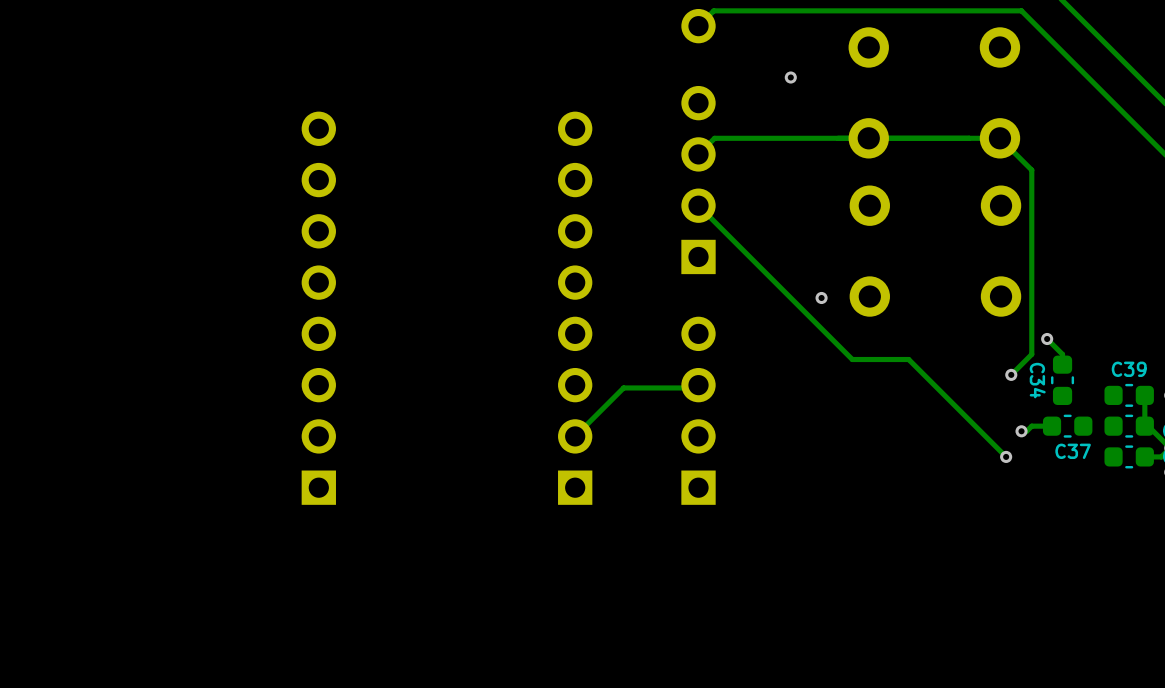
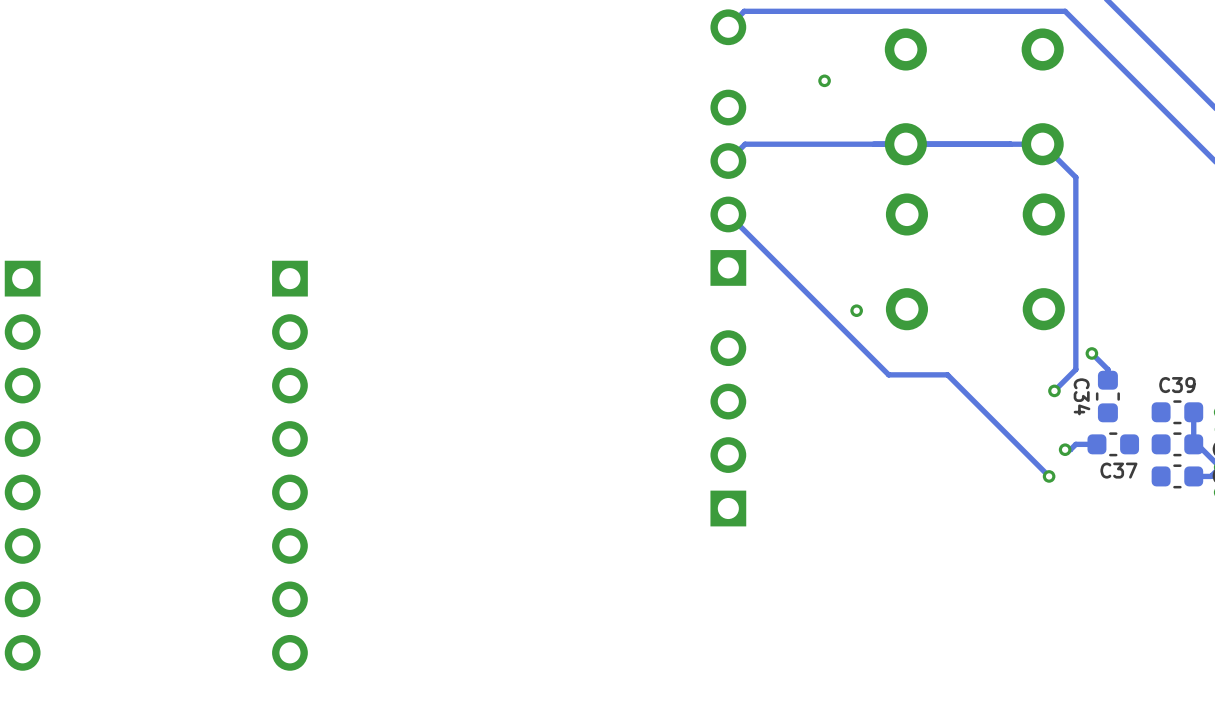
part rotation: 0° (318, 308) -> 180° (289, 465)
part: (575, 308) -> none
track: (698, 385) (695, 387) (623, 387) (575, 436) -> none
part: none -> (22, 465)

